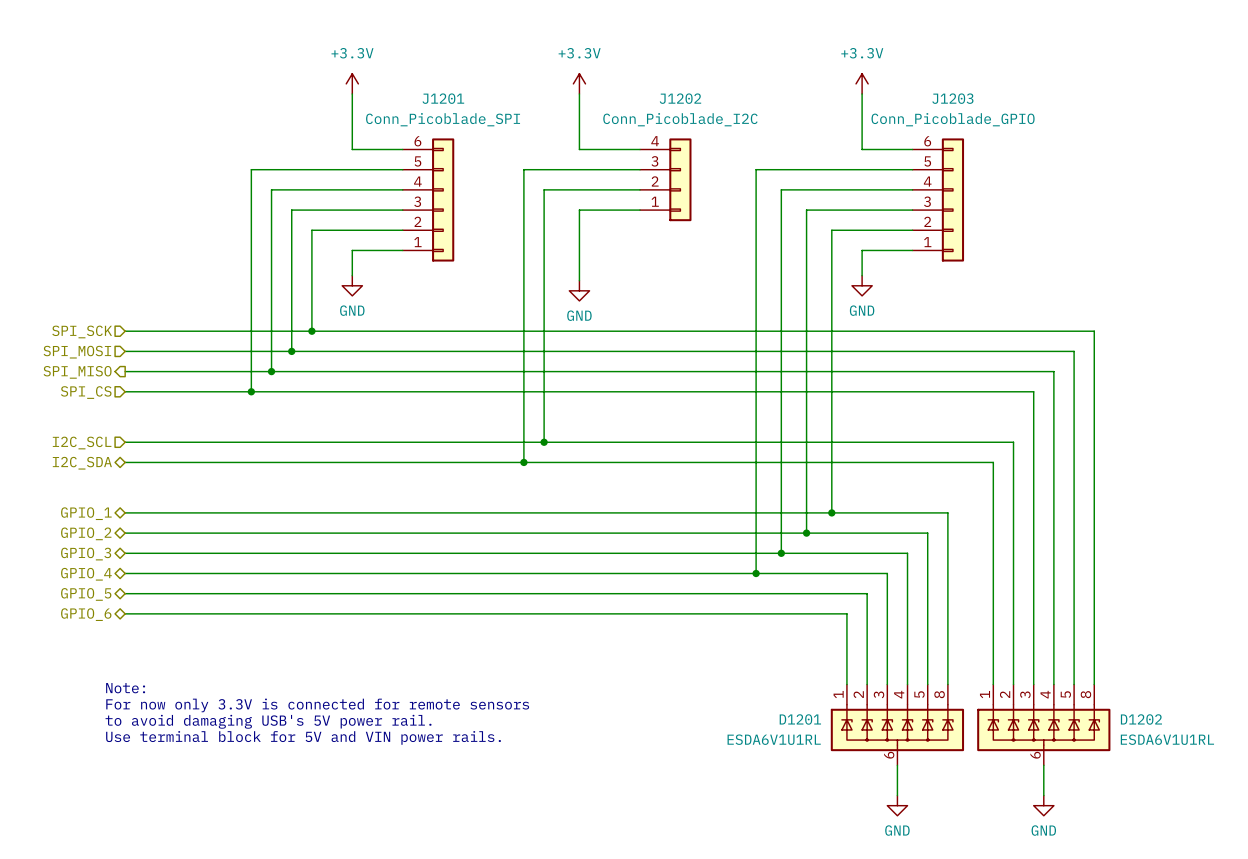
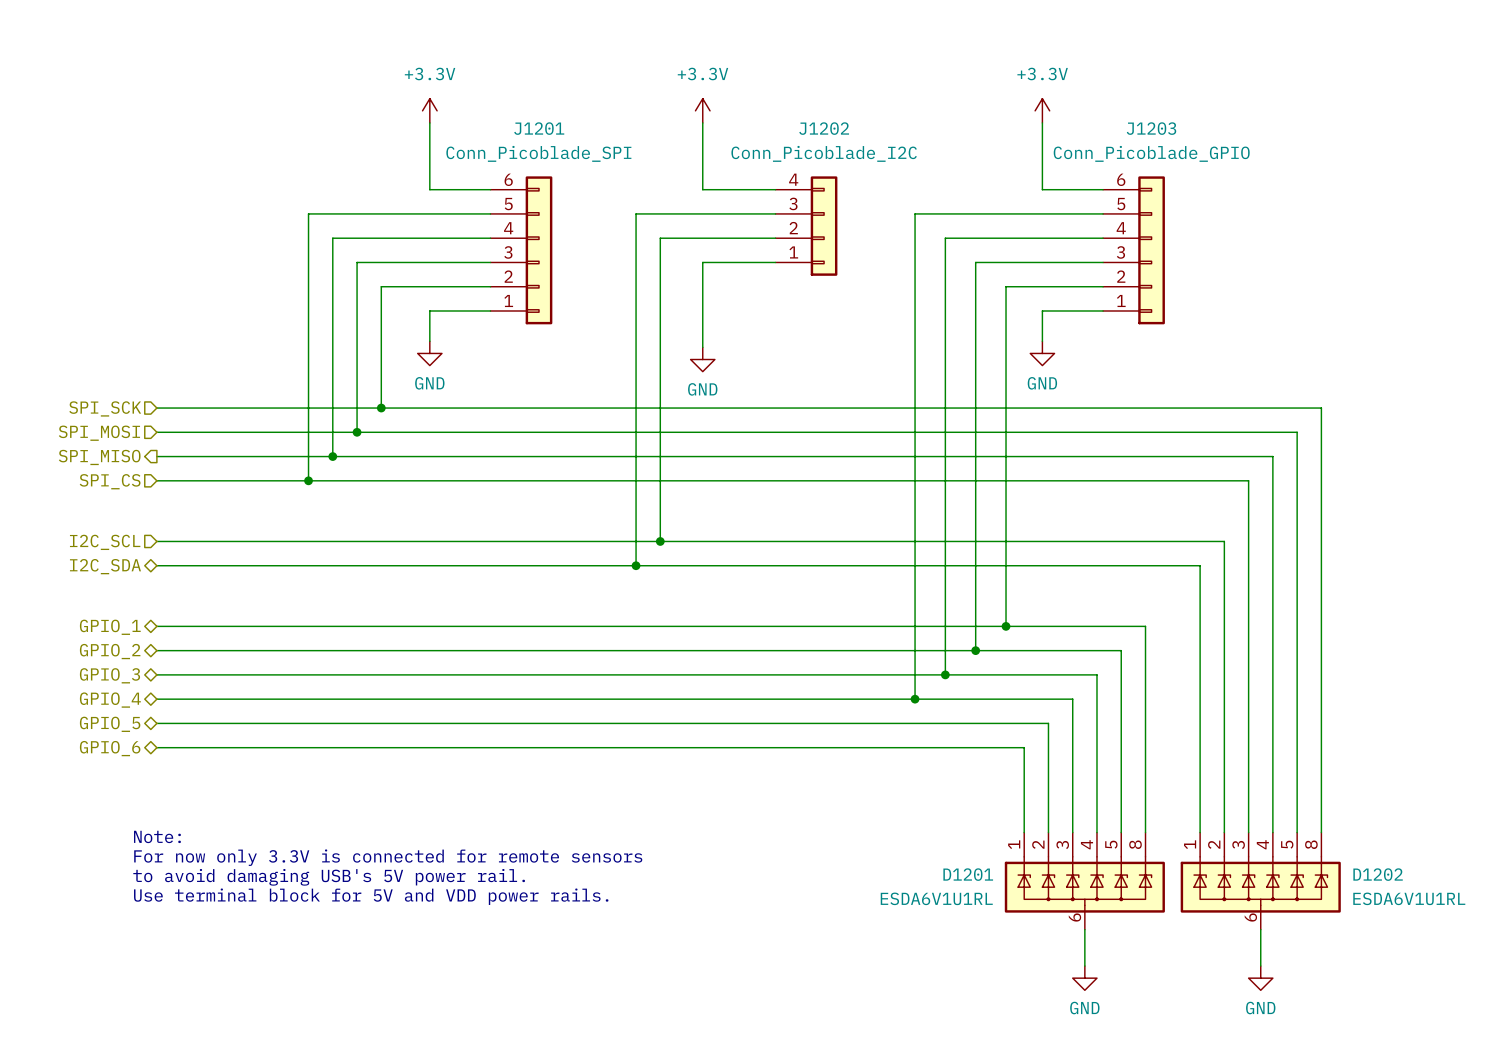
text: Use terminal block for 5V and VIN power rails. (303, 737) -> Use terminal block for 5V and VDD power rails. (371, 896)

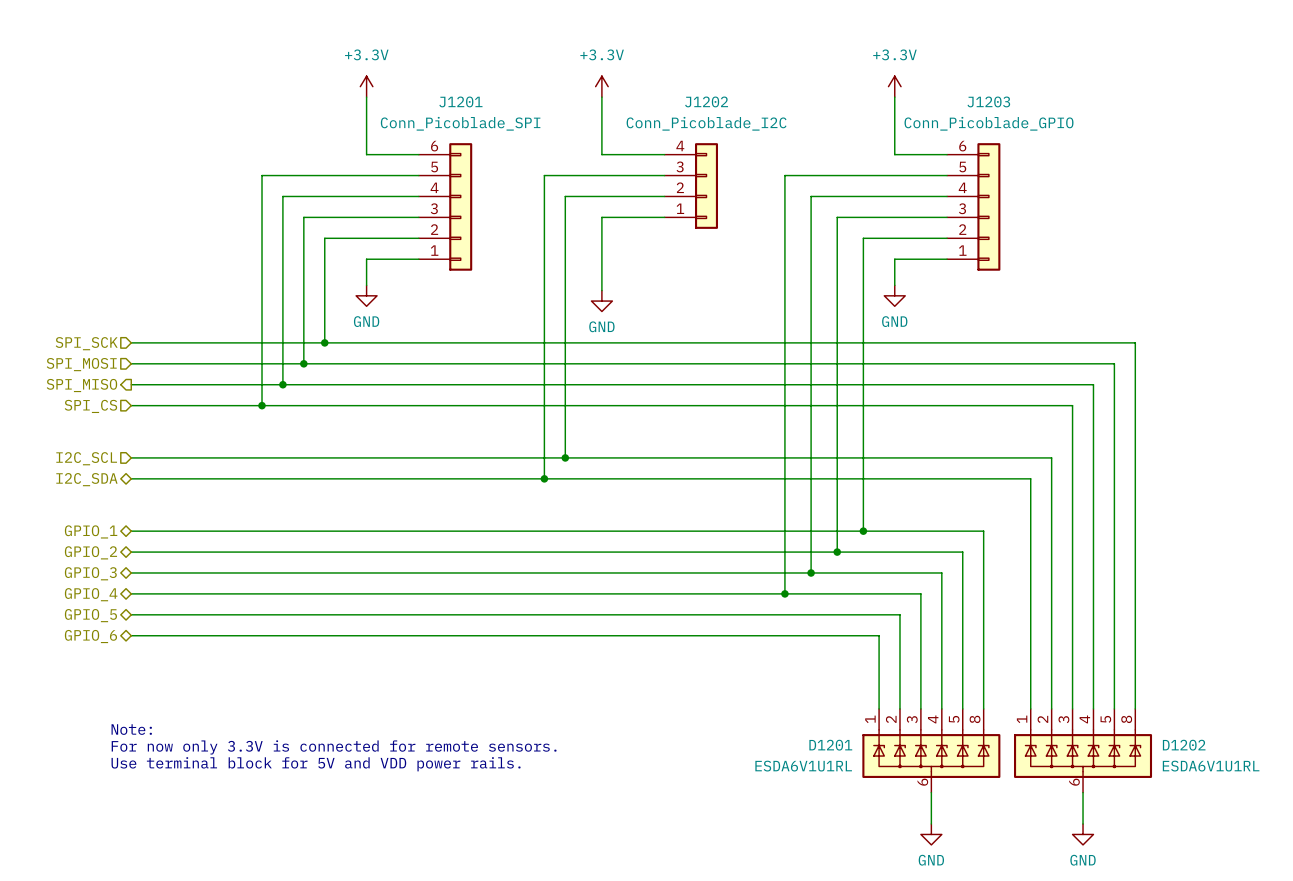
text: Note: (157, 836) -> none
text: For now only 3.3V is connected for remote sensors (388, 857) -> Note: (131, 729)
text: to avoid damaging USB's 5V power rail. (329, 877) -> For now only 3.3V is connected for remote sensors. (334, 747)

